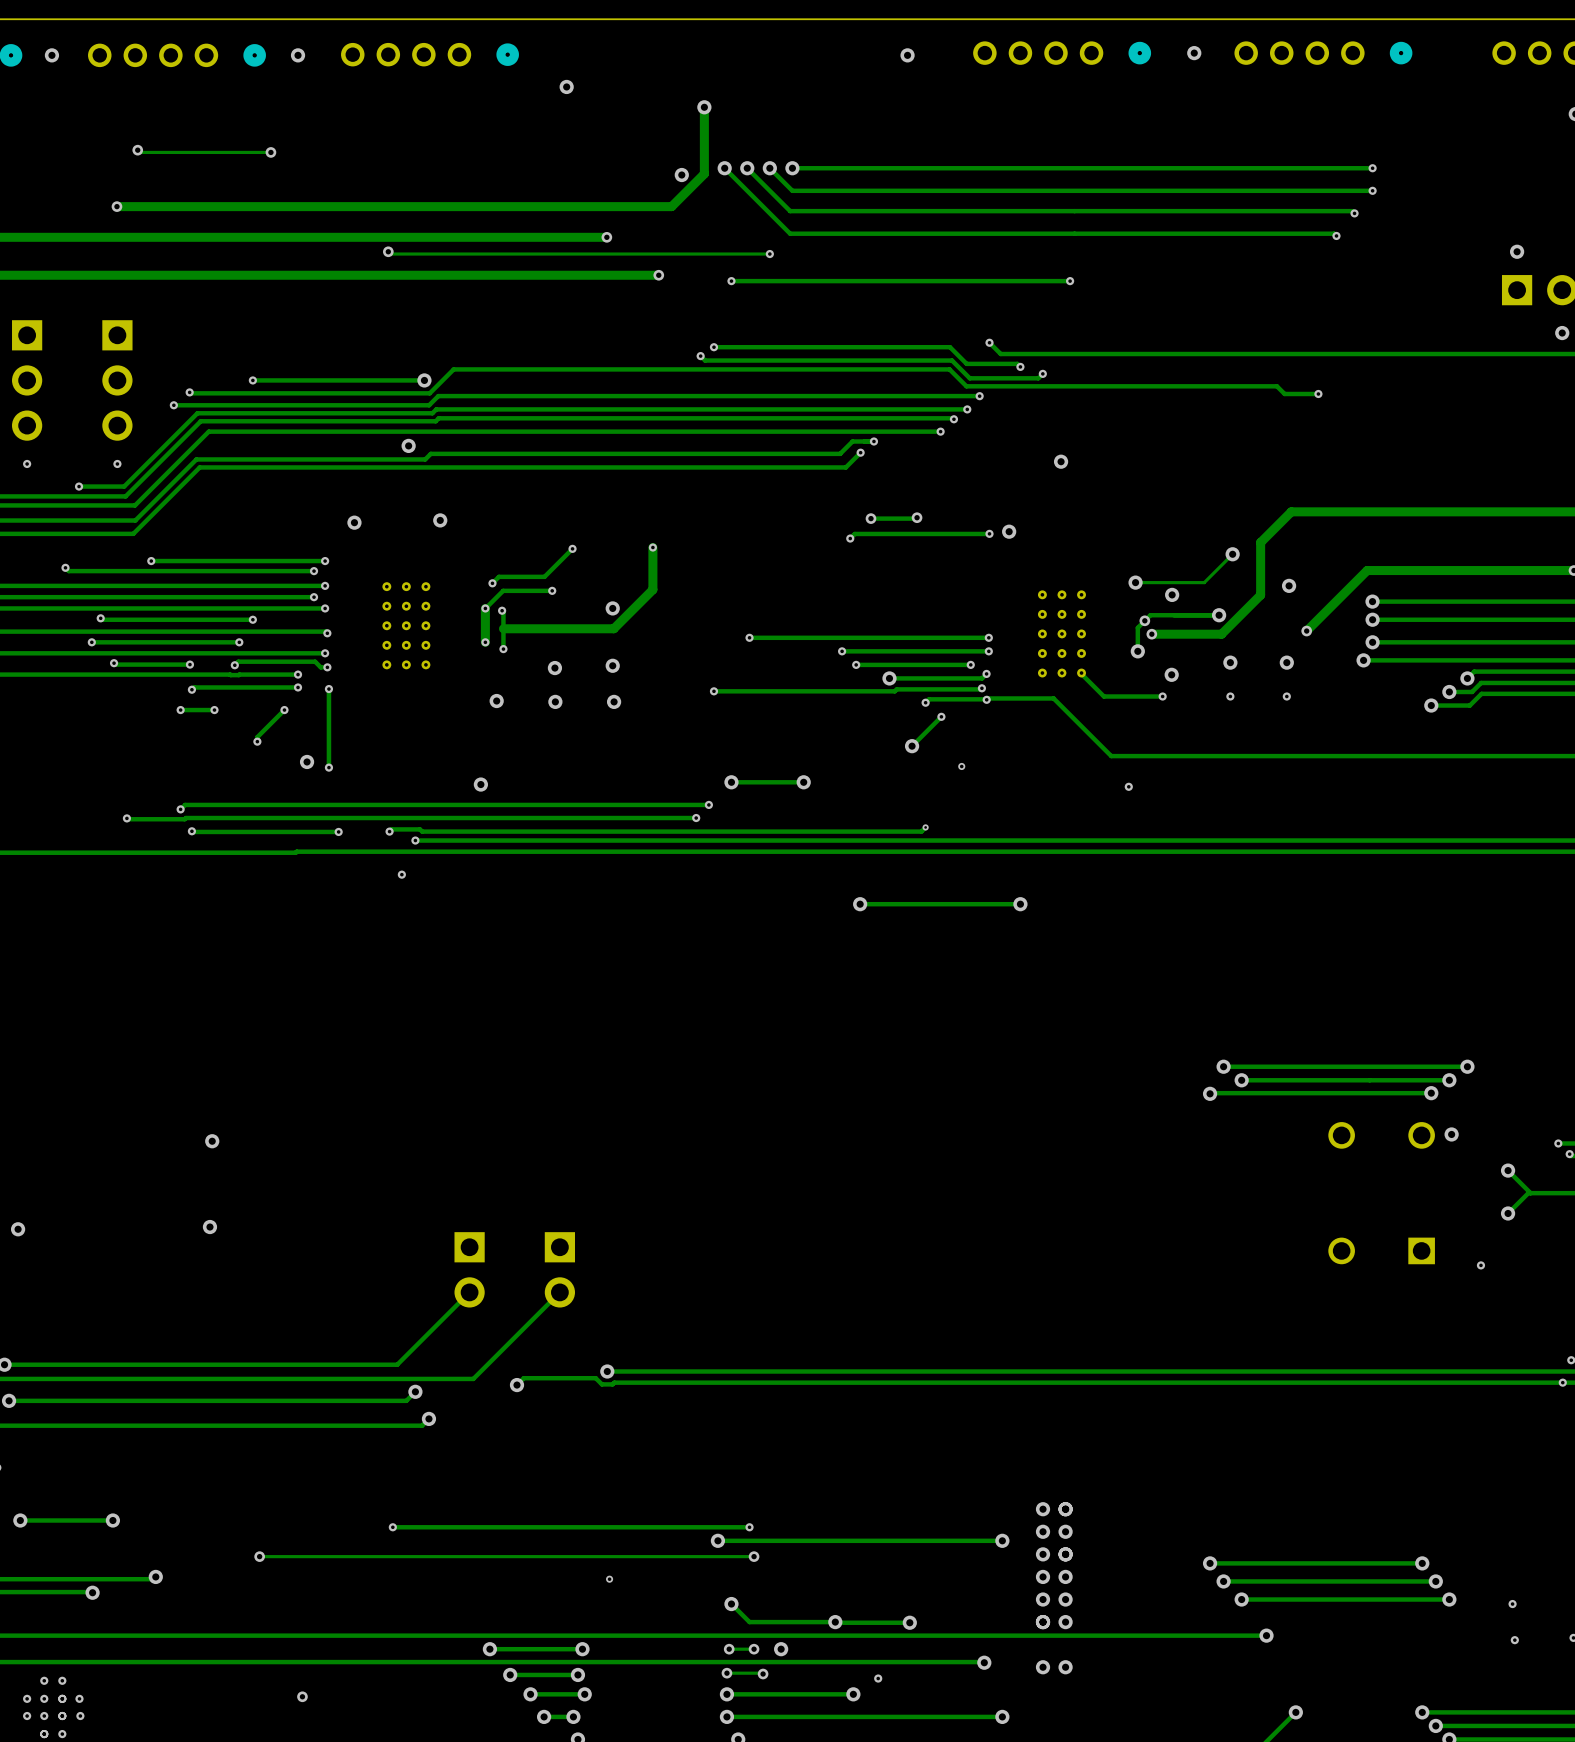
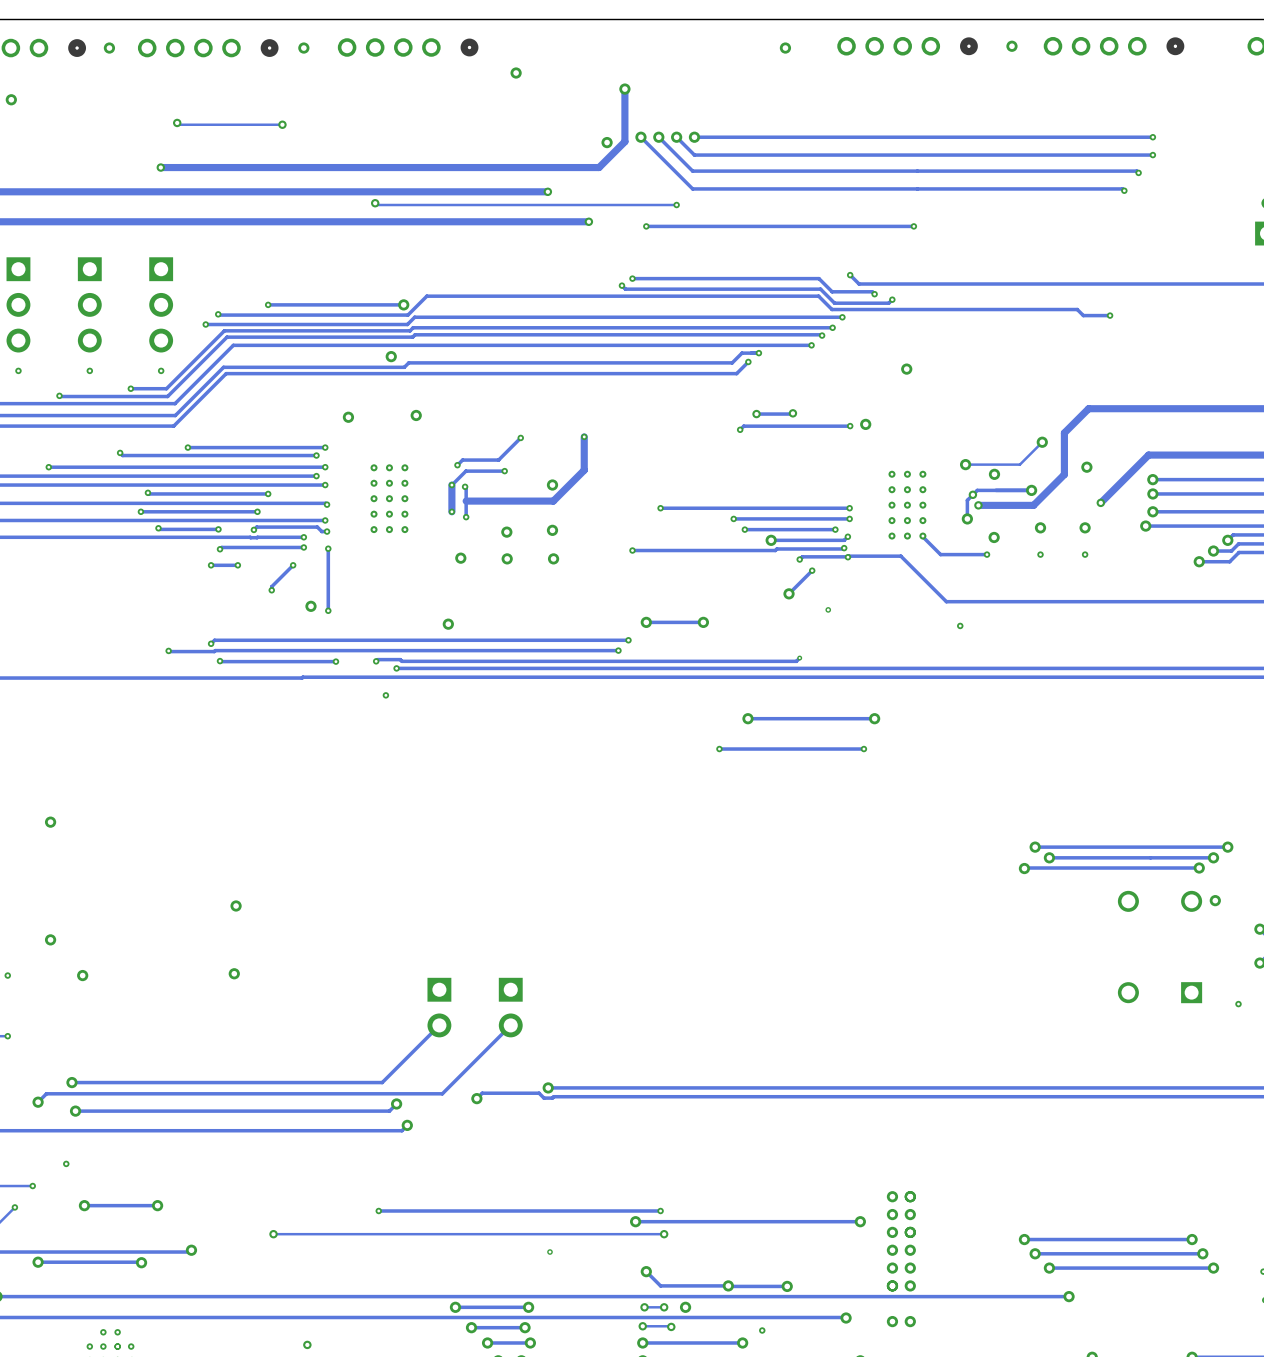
via: none -> (719, 749)
track: none -> (863, 749) (719, 749)
via: none -> (863, 749)

